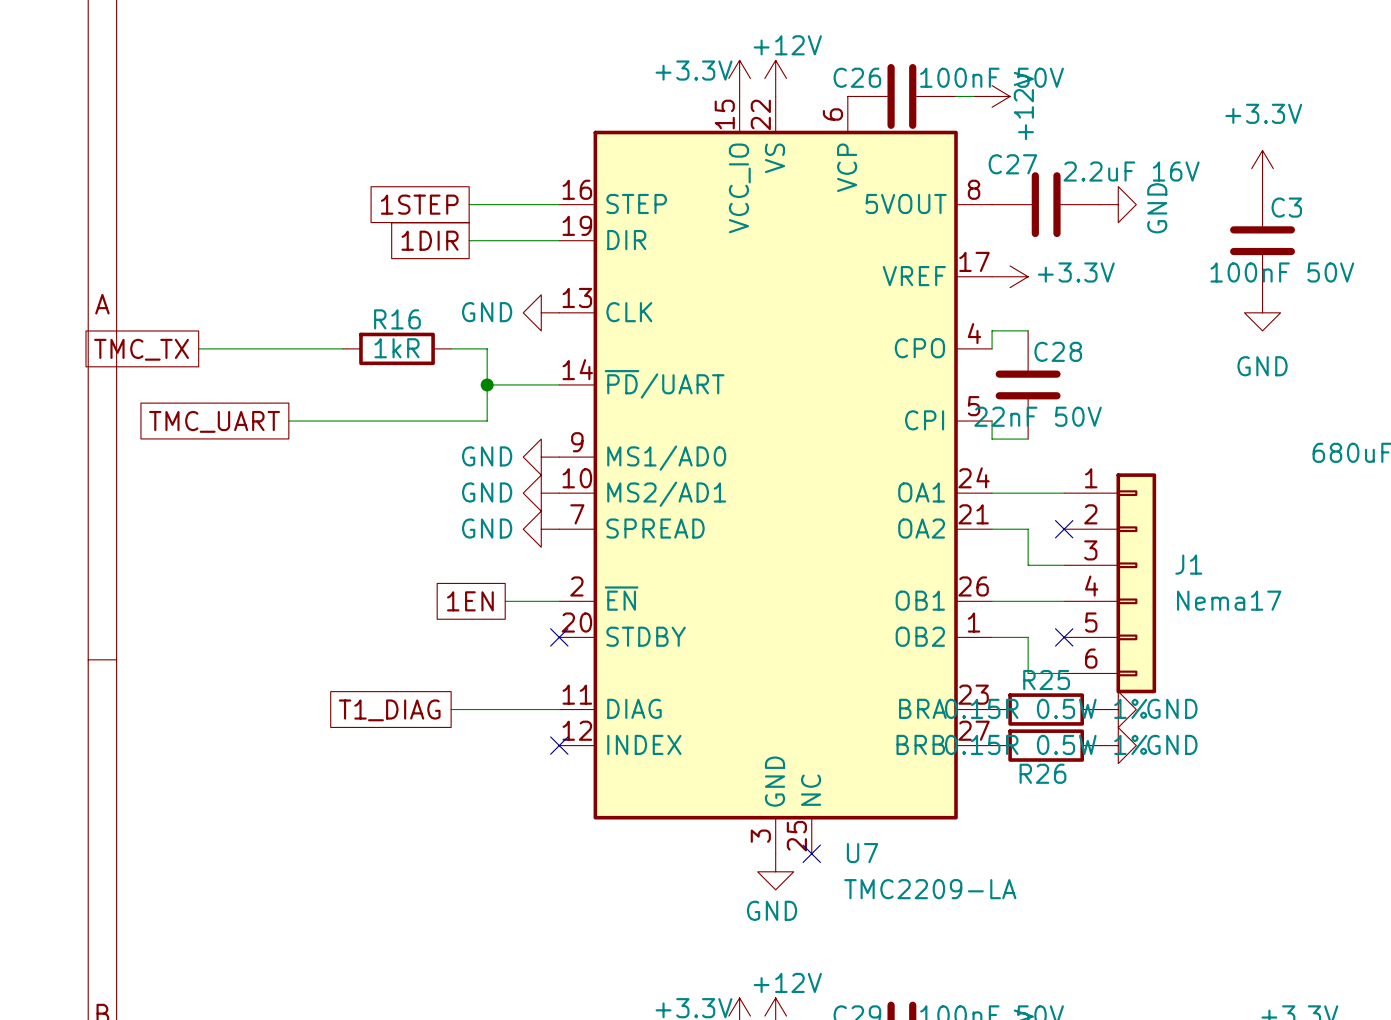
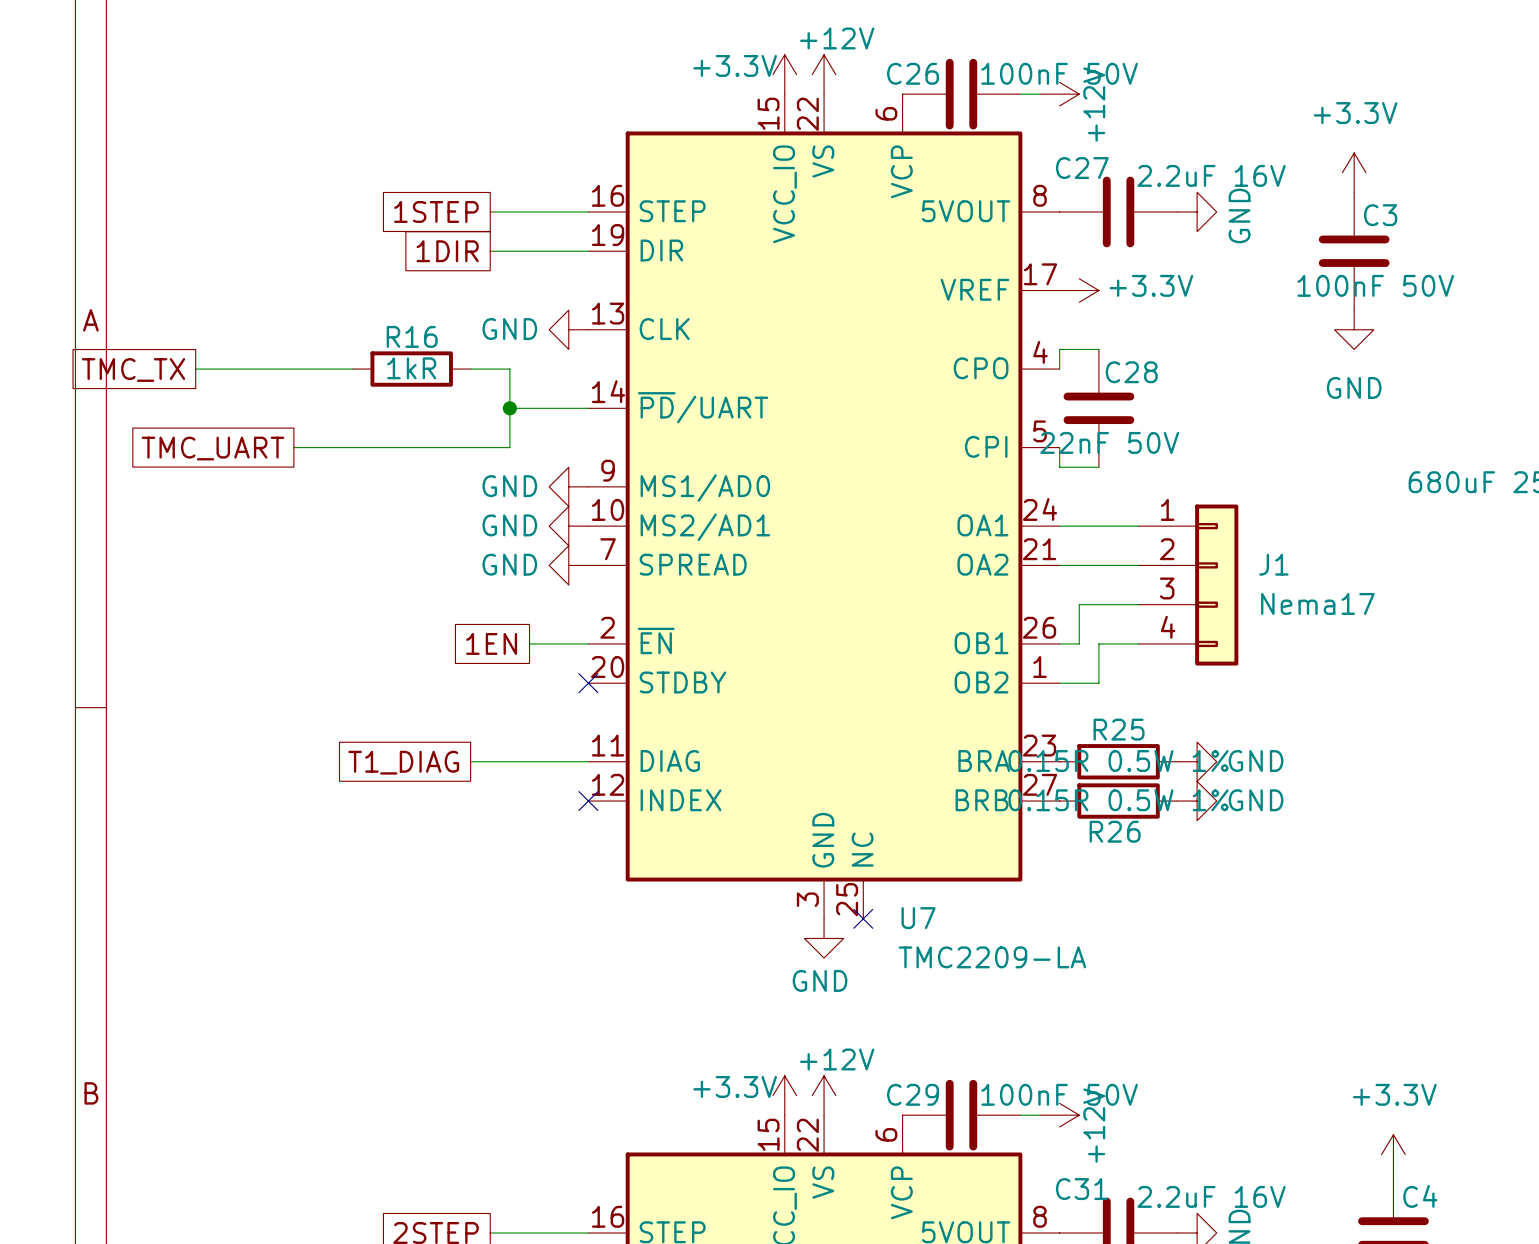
J1 symbol: [1064, 473, 1157, 694] -> [1138, 504, 1239, 666]
wire: (1028, 529) (1028, 565) -> (1098, 565) (1138, 565)
no-connect mark: (1064, 529) -> none
wire: (1010, 601) (1028, 601) -> (1079, 643) (1079, 604) (1098, 604)
wire: (1028, 637) (1028, 673) (1064, 673) -> (1098, 683) (1098, 643)
no-connect mark: (1064, 637) -> none

